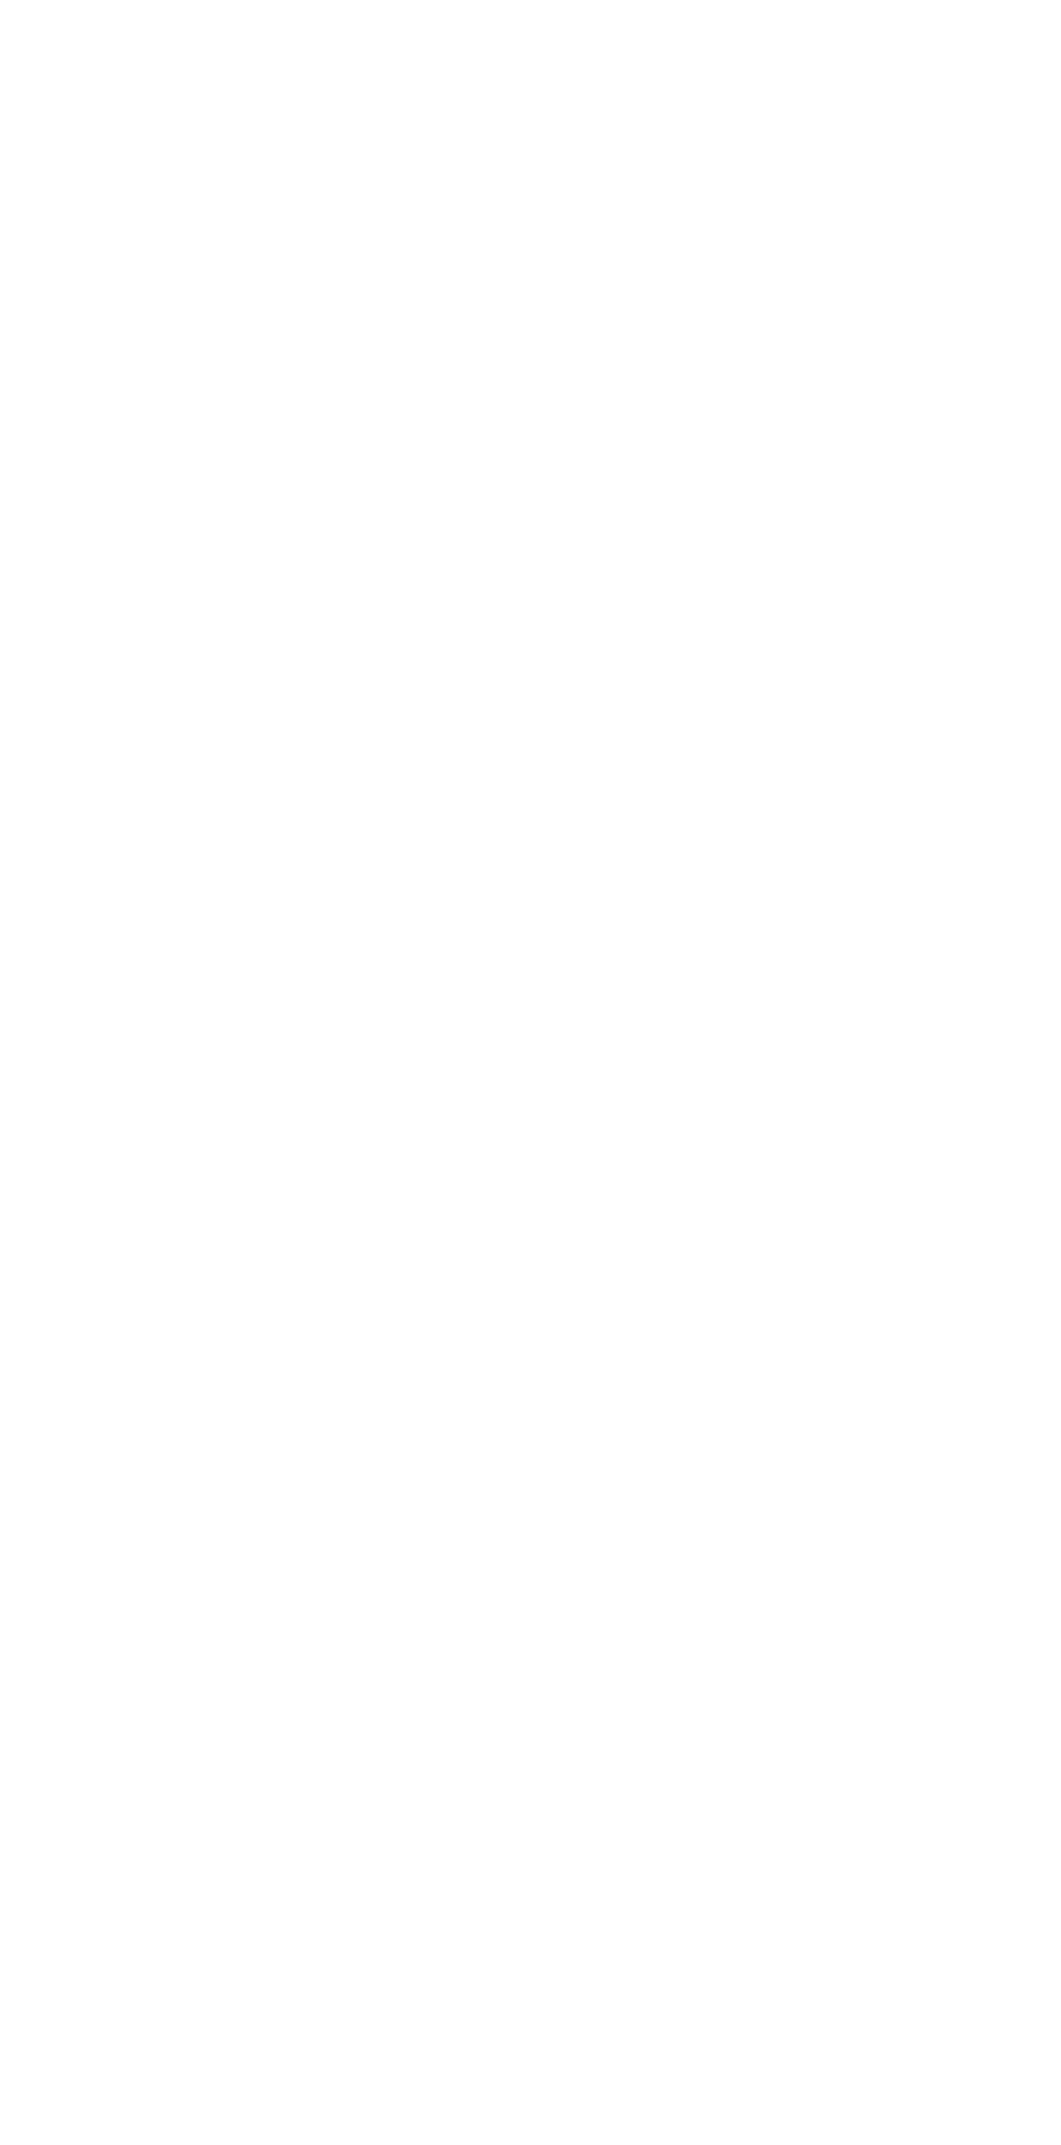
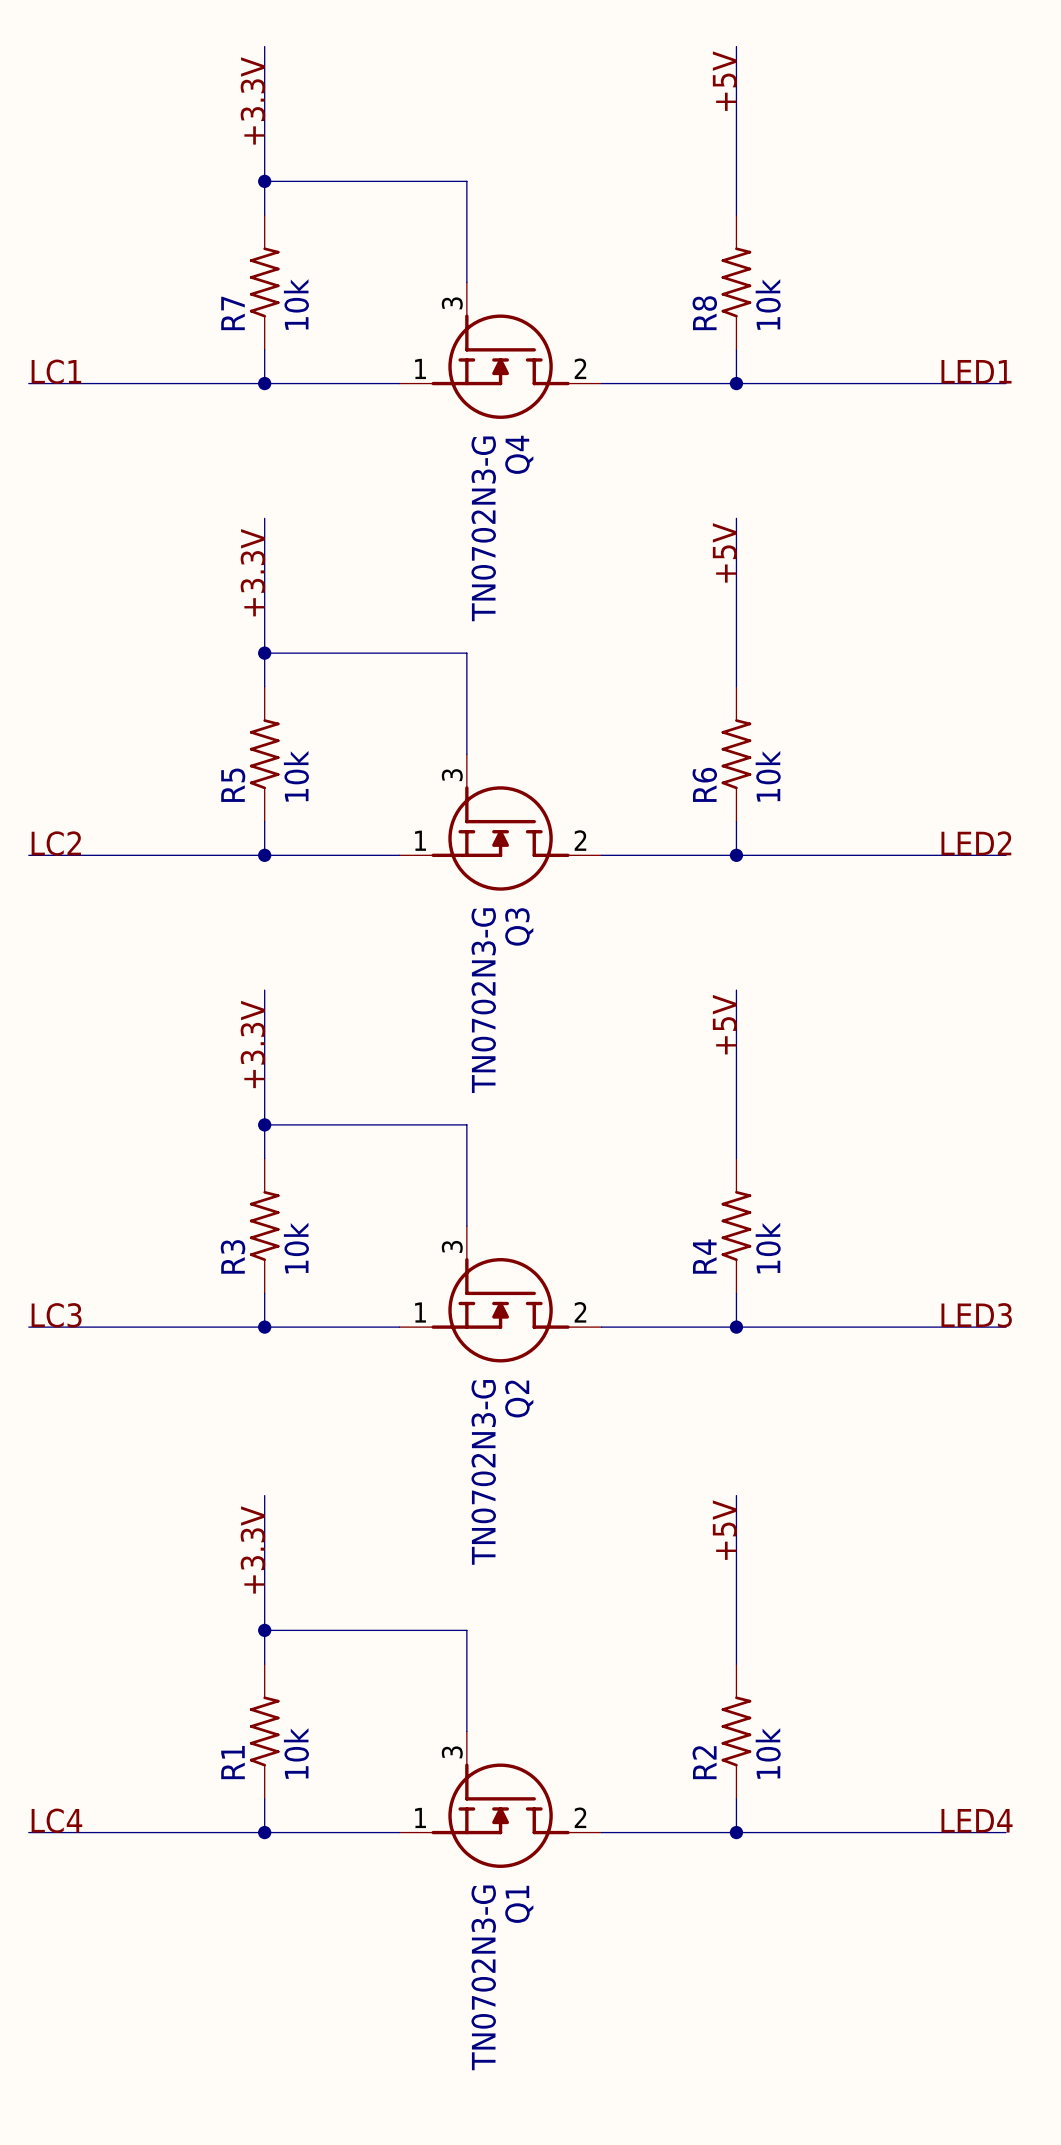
wire: none -> (264, 46) (264, 215)
wire: none -> (736, 46) (736, 215)
label: none -> +5V (724, 81)
label: none -> +3.3V (252, 100)
wire: none -> (264, 181) (466, 181) (466, 282)
junction: none -> (264, 181)
R7: none -> 10k (264, 282)
R8: none -> 10k (736, 282)
wire: none -> (264, 349) (264, 383)
wire: none -> (736, 349) (736, 383)
Q4: none -> TN0702N3-G (500, 350)
label: none -> LC1 (56, 371)
label: none -> LED1 (976, 371)
wire: none -> (28, 383) (399, 383)
junction: none -> (264, 383)
wire: none -> (601, 383) (1006, 383)
junction: none -> (736, 383)
wire: none -> (264, 518) (264, 686)
wire: none -> (736, 518) (736, 686)
label: none -> +5V (724, 552)
label: none -> +3.3V (252, 572)
wire: none -> (264, 653) (466, 653) (466, 754)
junction: none -> (264, 653)
R5: none -> 10k (264, 754)
R6: none -> 10k (736, 754)
wire: none -> (264, 821) (264, 855)
wire: none -> (736, 821) (736, 855)
Q3: none -> TN0702N3-G (500, 822)
label: none -> LC2 (56, 843)
label: none -> LED2 (976, 843)
wire: none -> (28, 855) (399, 855)
junction: none -> (264, 855)
wire: none -> (601, 855) (1006, 855)
junction: none -> (736, 855)
wire: none -> (264, 990) (264, 1158)
wire: none -> (736, 990) (736, 1158)
label: none -> +5V (724, 1024)
label: none -> +3.3V (252, 1044)
wire: none -> (264, 1124) (466, 1124) (466, 1226)
junction: none -> (264, 1124)
R3: none -> 10k (264, 1226)
R4: none -> 10k (736, 1226)
wire: none -> (264, 1293) (264, 1327)
wire: none -> (736, 1293) (736, 1327)
Q2: none -> TN0702N3-G (500, 1294)
label: none -> LC3 (56, 1315)
label: none -> LED3 (976, 1315)
wire: none -> (28, 1327) (399, 1327)
junction: none -> (264, 1327)
wire: none -> (601, 1327) (1006, 1327)
junction: none -> (736, 1327)
wire: none -> (264, 1495) (264, 1664)
wire: none -> (736, 1495) (736, 1664)
label: none -> +5V (724, 1530)
label: none -> +3.3V (252, 1549)
wire: none -> (264, 1630) (466, 1630) (466, 1731)
junction: none -> (264, 1630)
R1: none -> 10k (264, 1731)
R2: none -> 10k (736, 1731)
wire: none -> (264, 1798) (264, 1832)
wire: none -> (736, 1798) (736, 1832)
Q1: none -> TN0702N3-G (500, 1799)
label: none -> LC4 (56, 1820)
label: none -> LED4 (977, 1820)
wire: none -> (28, 1832) (399, 1832)
junction: none -> (264, 1832)
wire: none -> (601, 1832) (1006, 1832)
junction: none -> (736, 1832)

